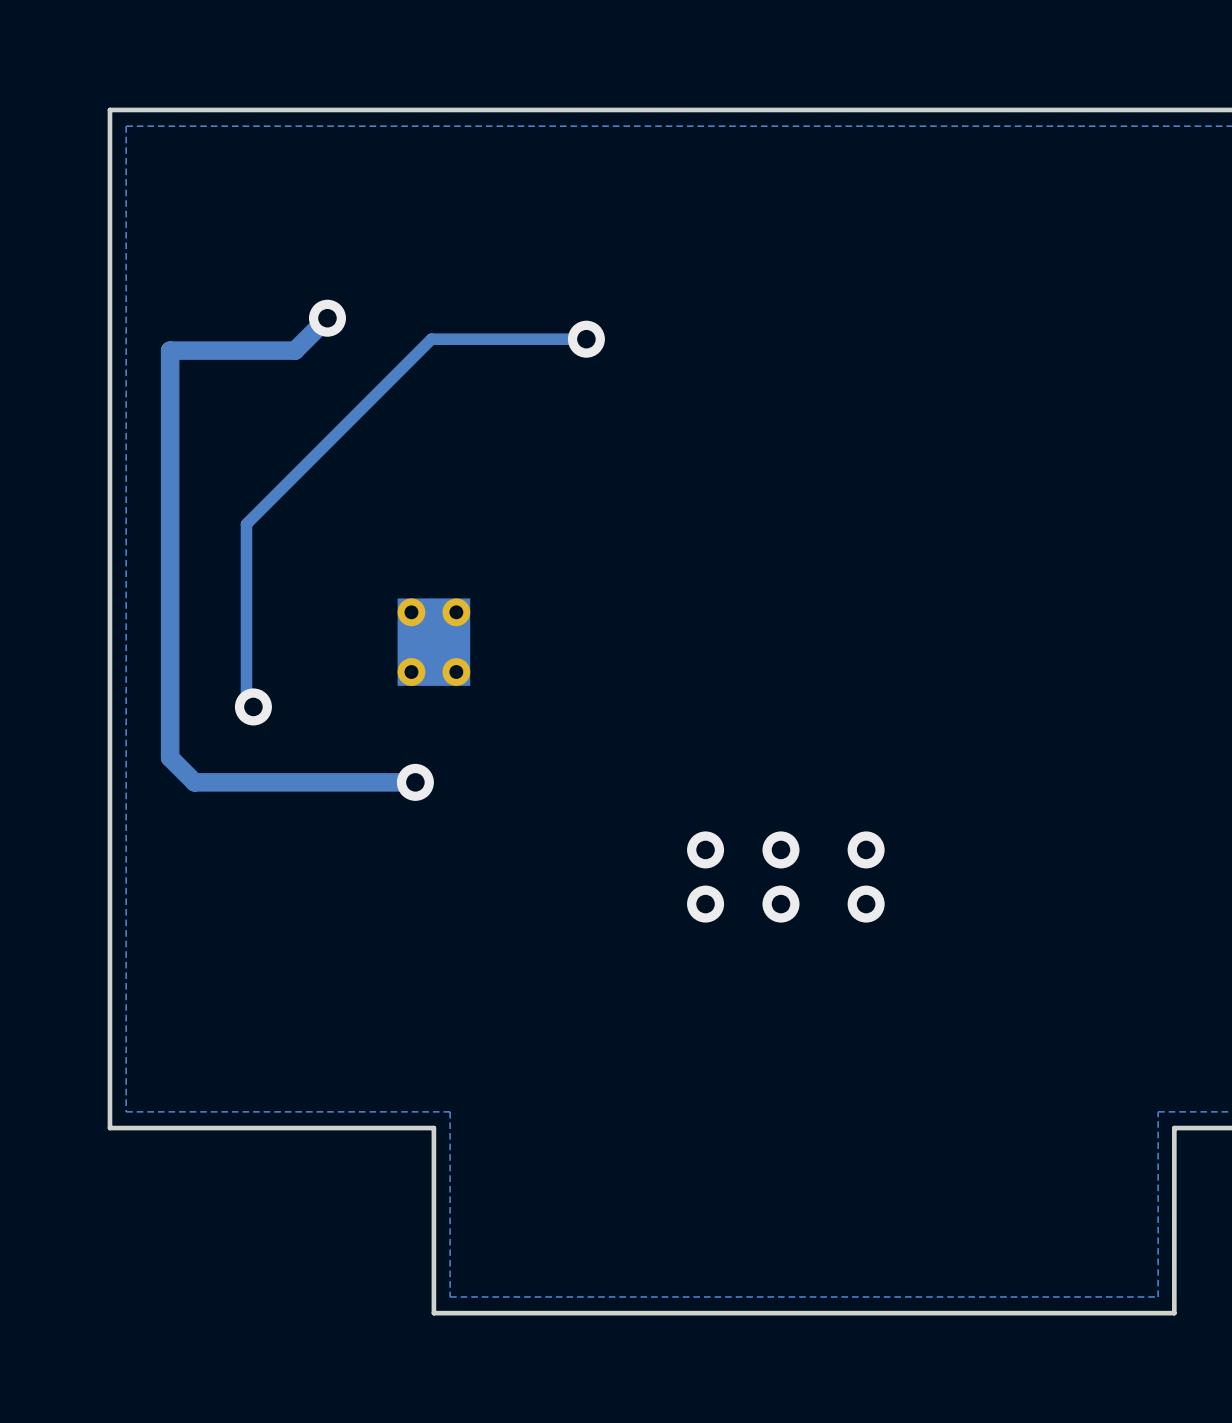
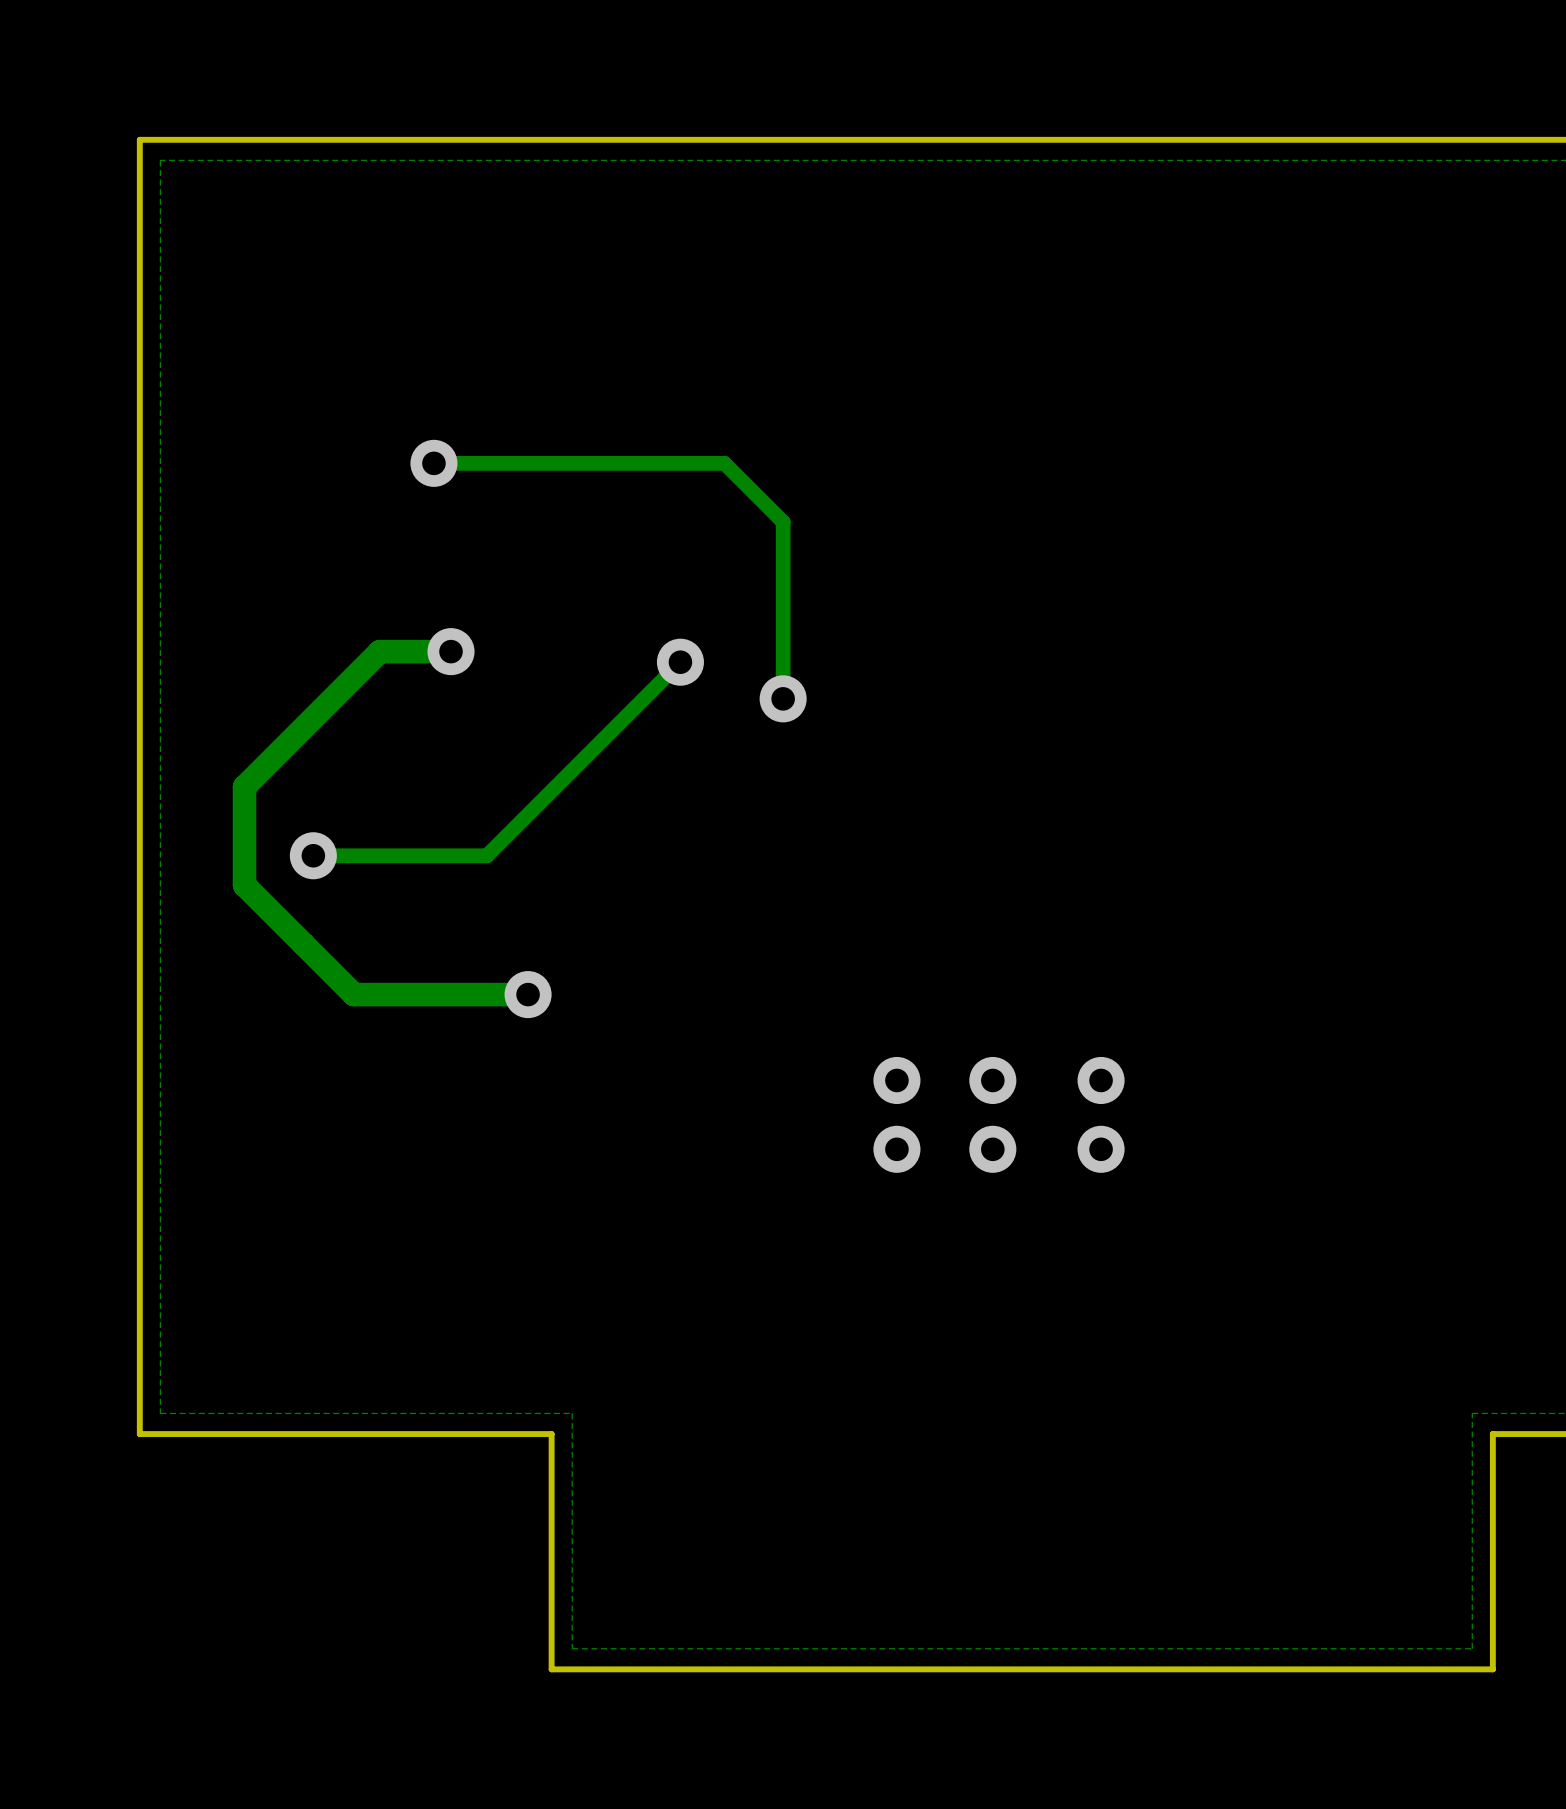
track: (327, 318) (295, 350) (170, 350) (170, 757) (194, 782) (278, 782) -> (451, 651) (379, 651) (244, 786) (244, 885) (353, 994)
via position: (327, 318) -> (433, 463)
via: (586, 339) -> none
track: (587, 340) (431, 339) (246, 524) (246, 700) (253, 706) (254, 705) -> none
track: none -> (433, 463) (724, 463) (783, 521) (783, 698)
via: none -> (451, 651)
track: none -> (680, 662) (486, 855) (313, 855)
via: none -> (680, 662)
via: none -> (783, 698)
part: (433, 642) -> none
via position: (253, 706) -> (313, 855)

